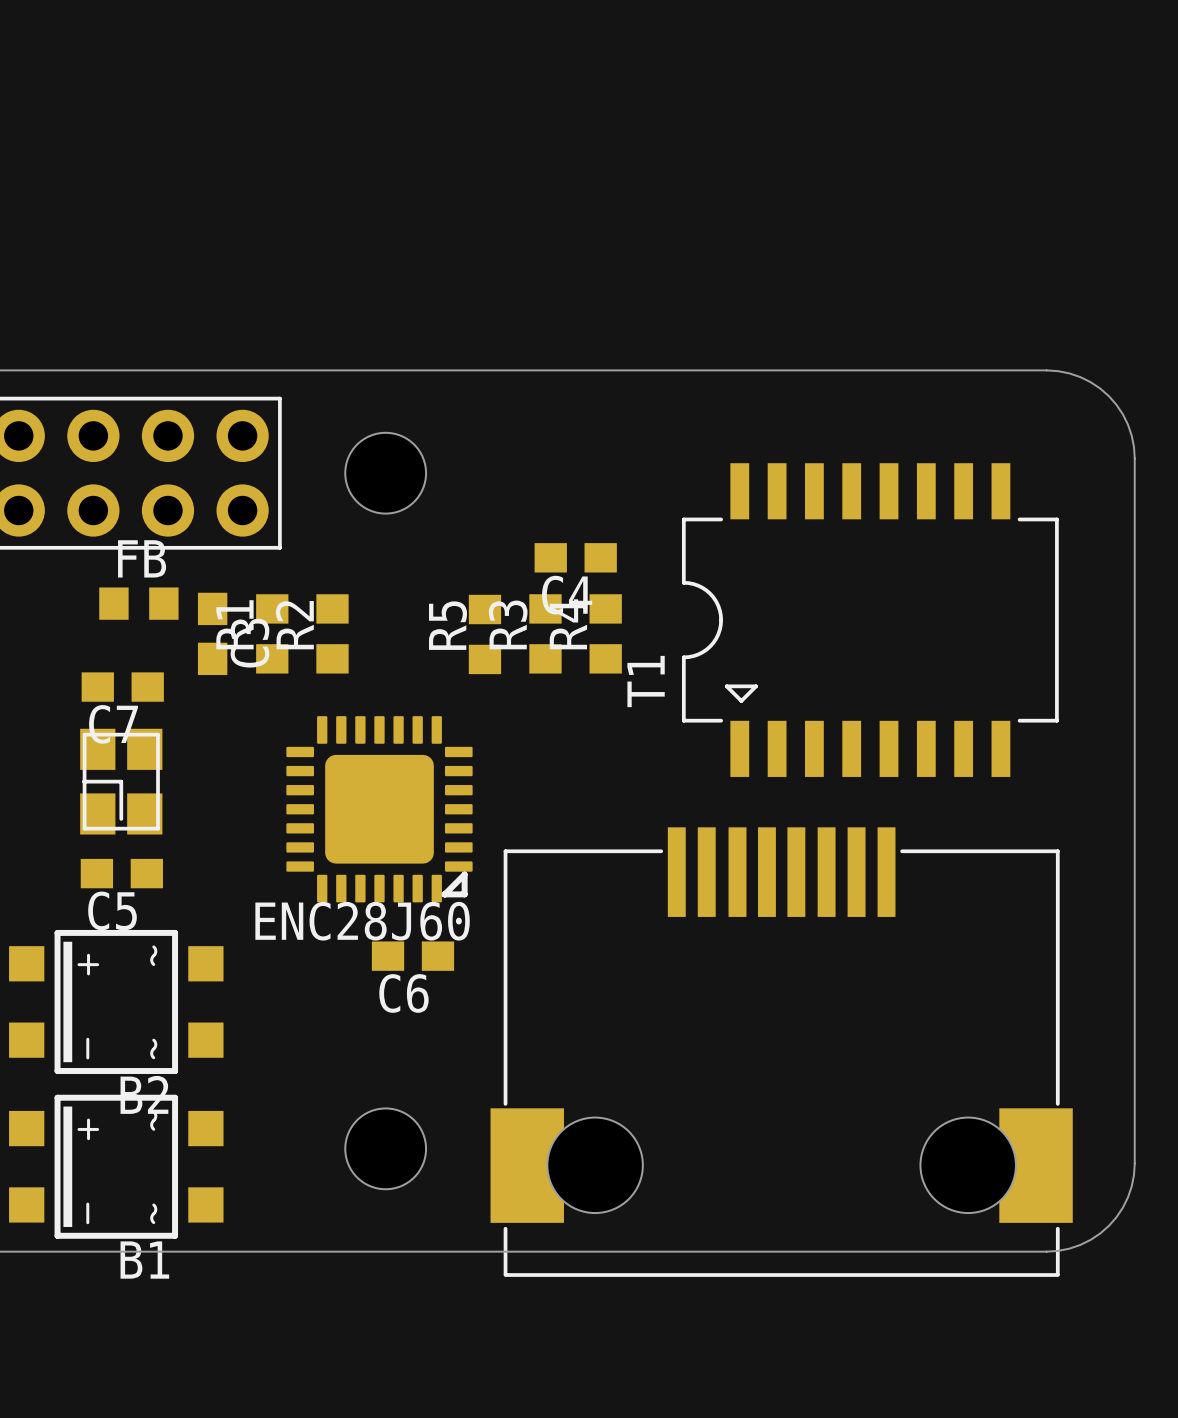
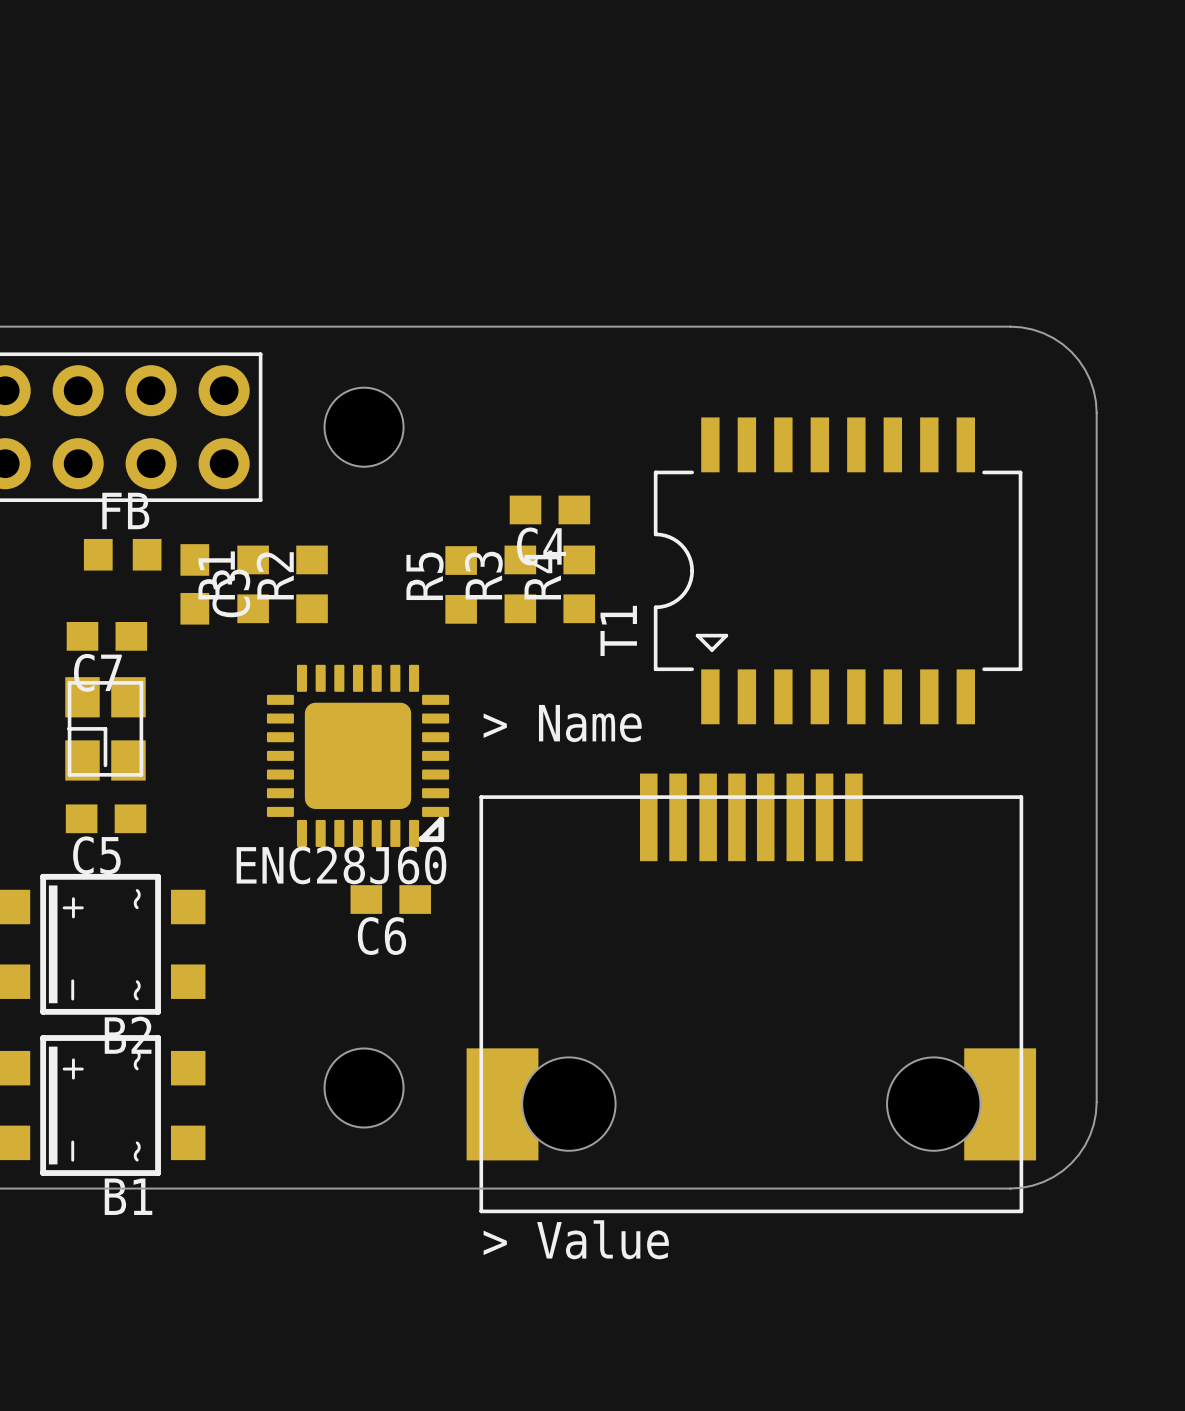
part footprint: [490, 827, 1073, 1277] -> [466, 773, 1037, 1214]

